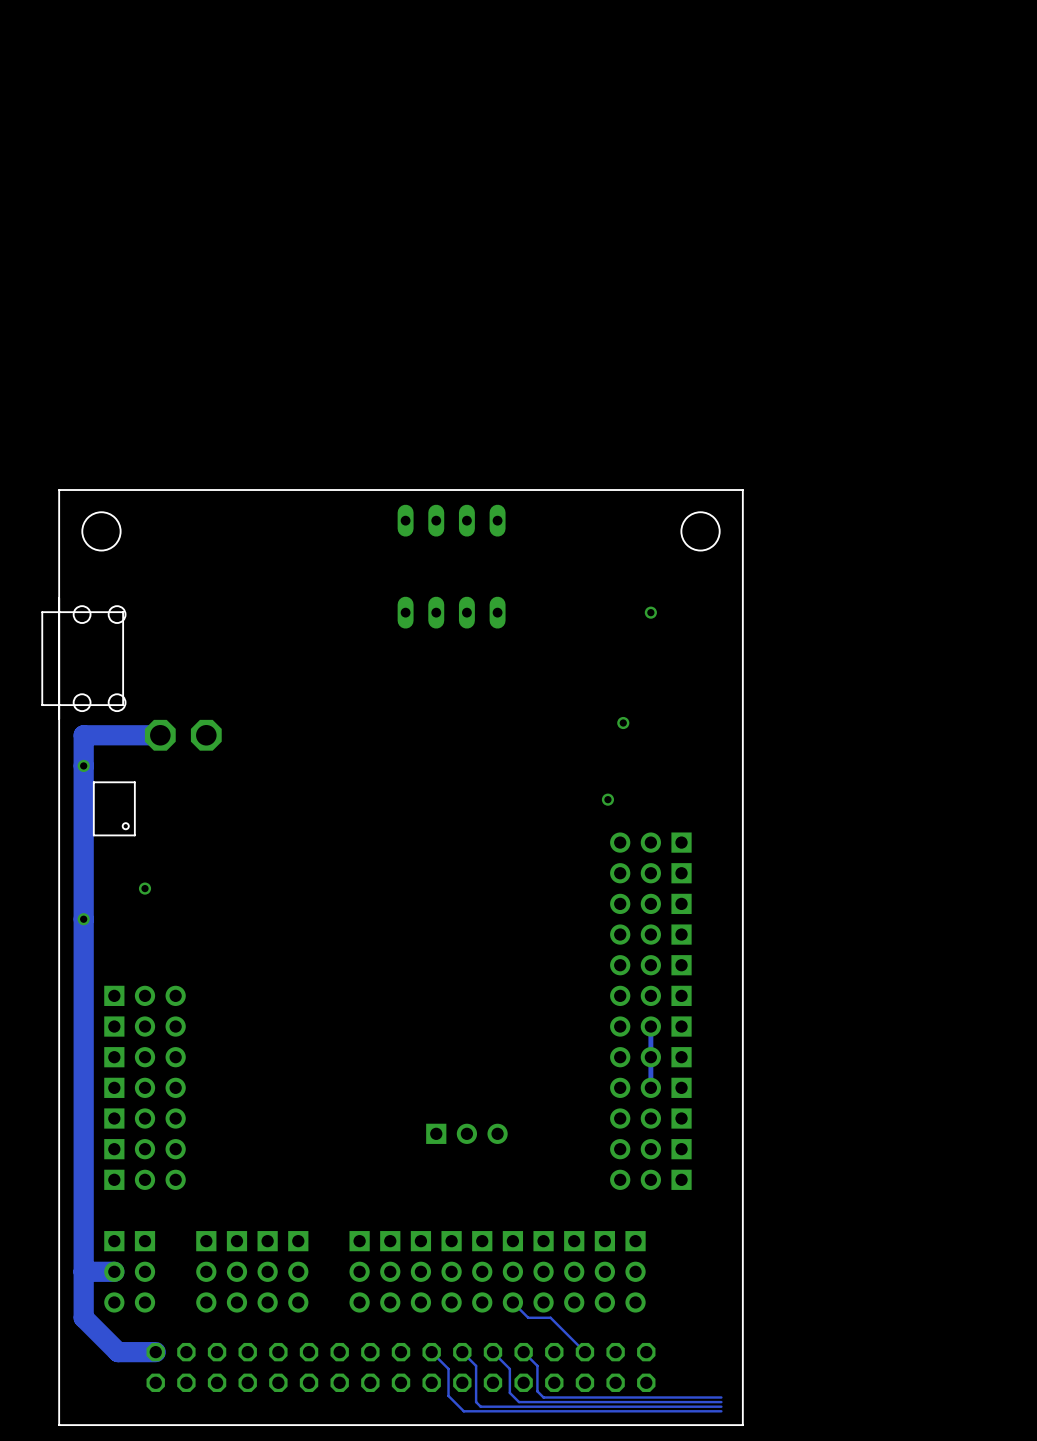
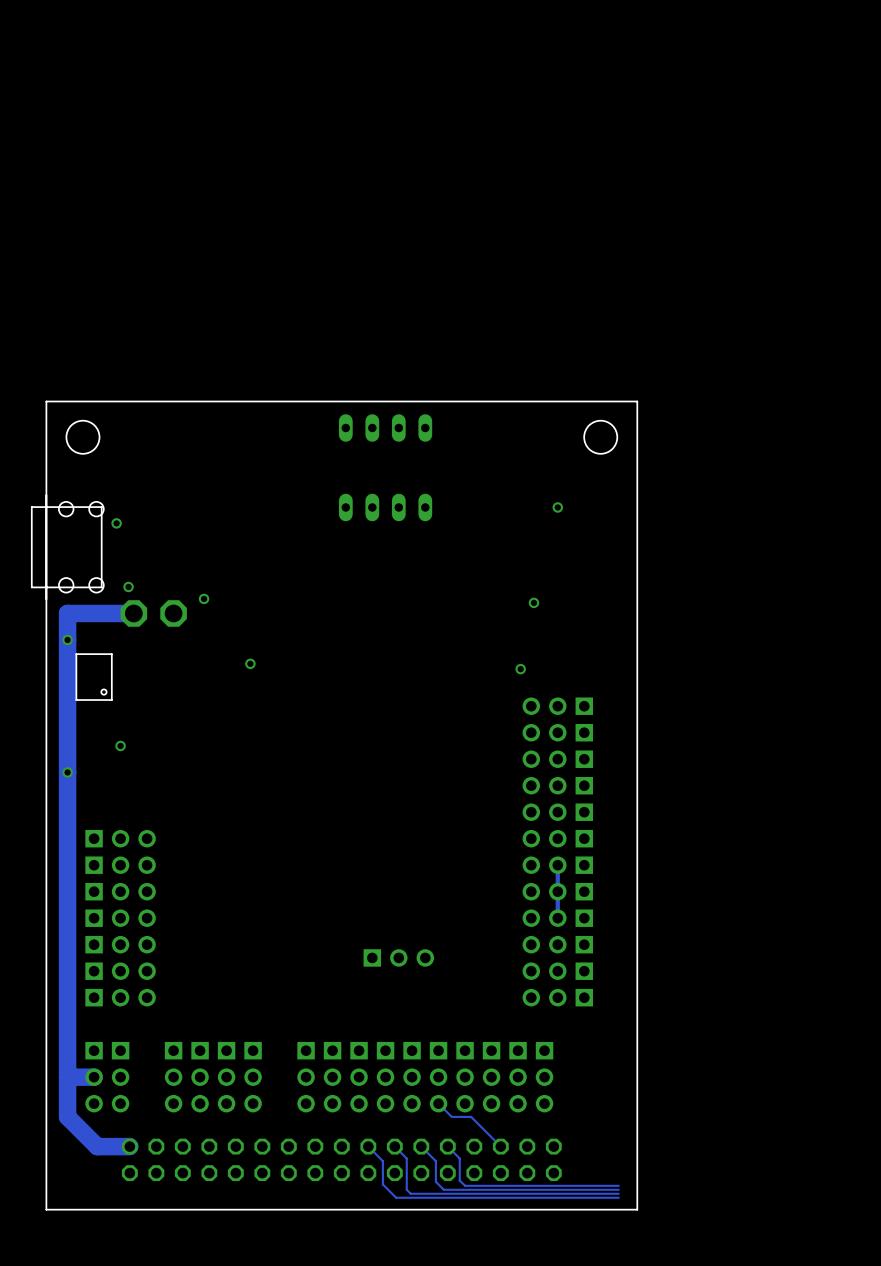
via: none -> (116, 523)
via: none -> (128, 586)
via: none -> (204, 598)
via: none -> (250, 663)

